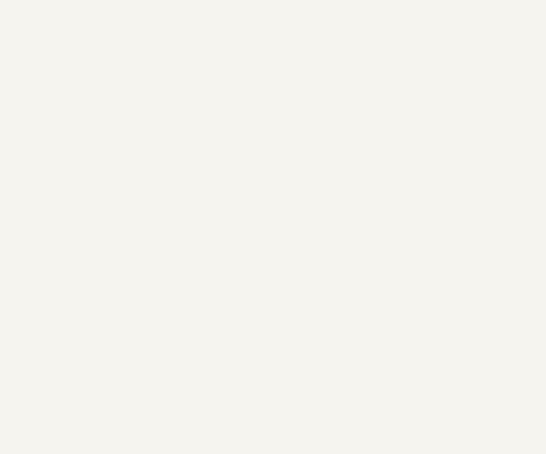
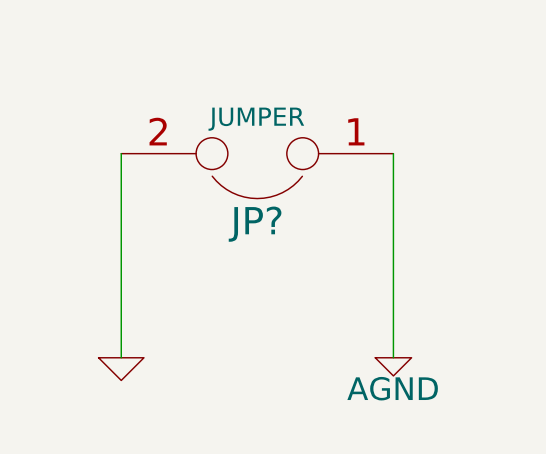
wire: none -> (121, 153) (121, 357)
wire: none -> (393, 153) (393, 357)
JP?: none -> JUMPER (257, 168)
power symbol: none -> AGND (393, 366)
power symbol: none -> (121, 369)

